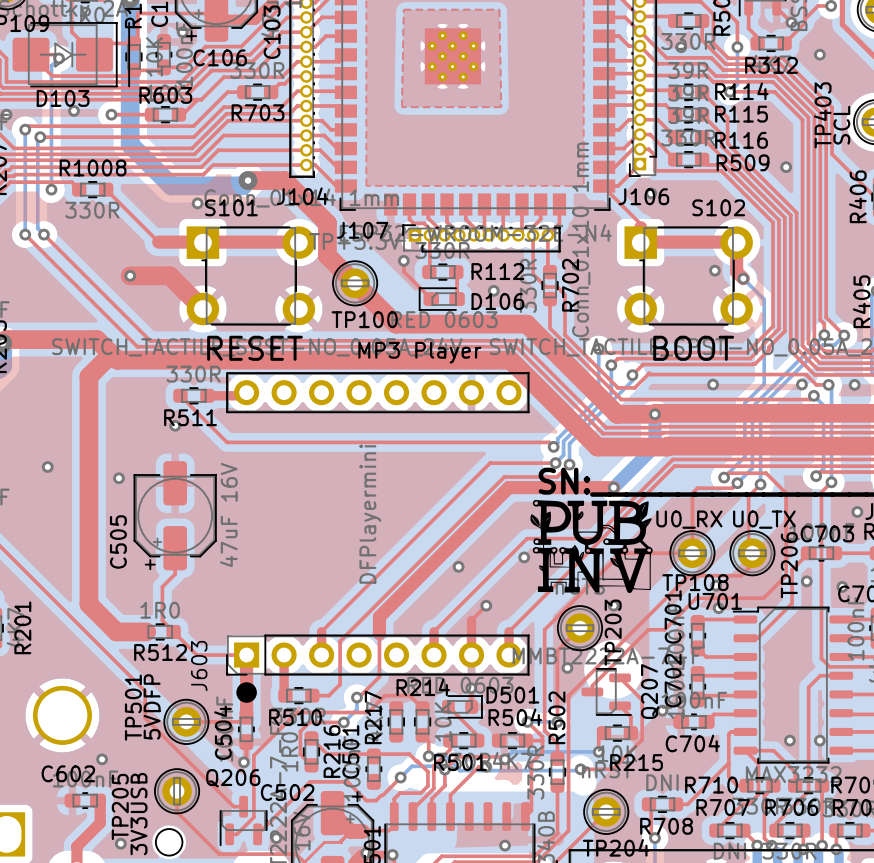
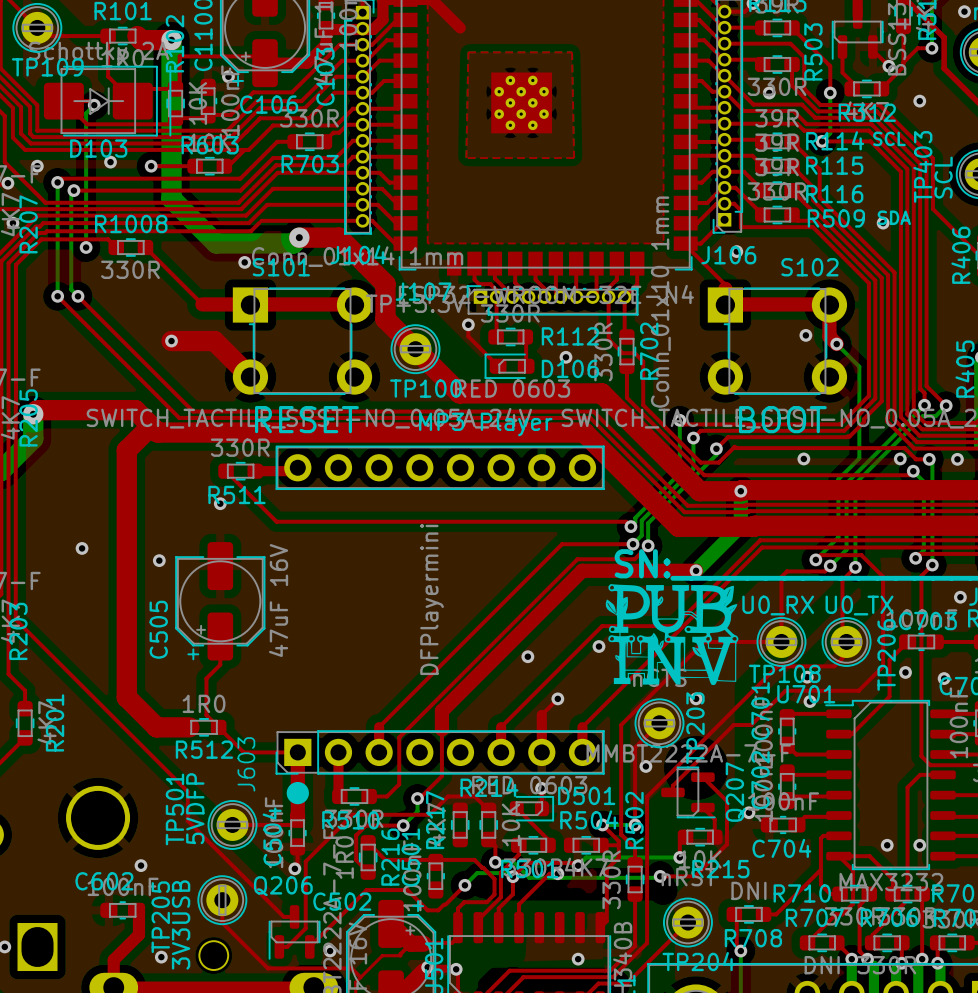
text: none -> SCL (889, 138)
text: none -> SDA (894, 217)

